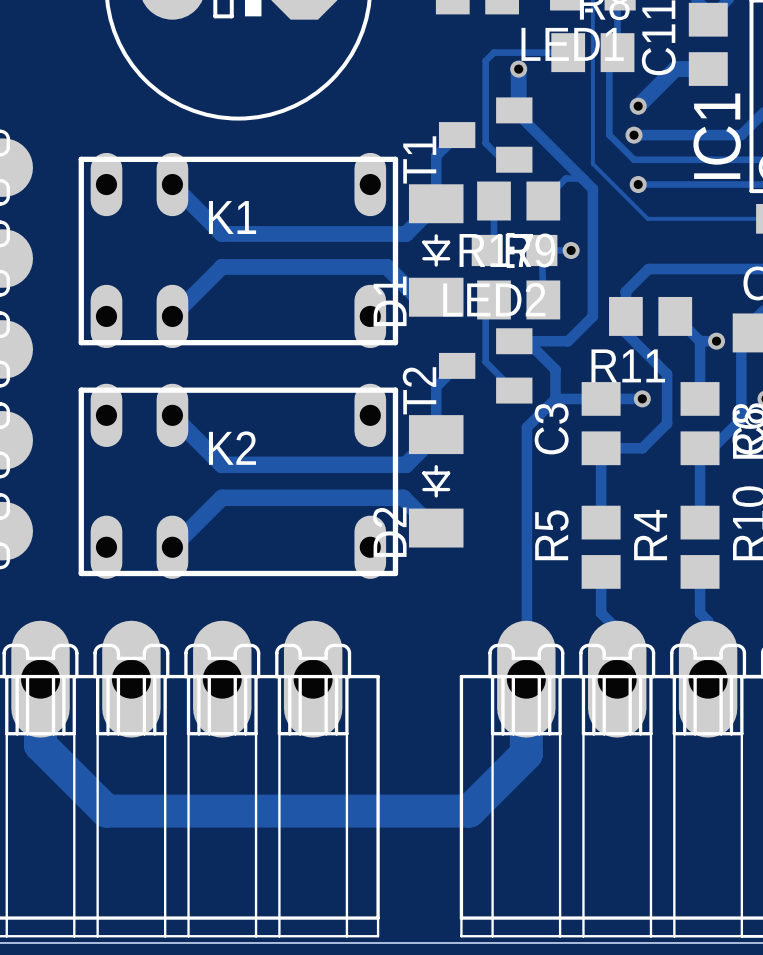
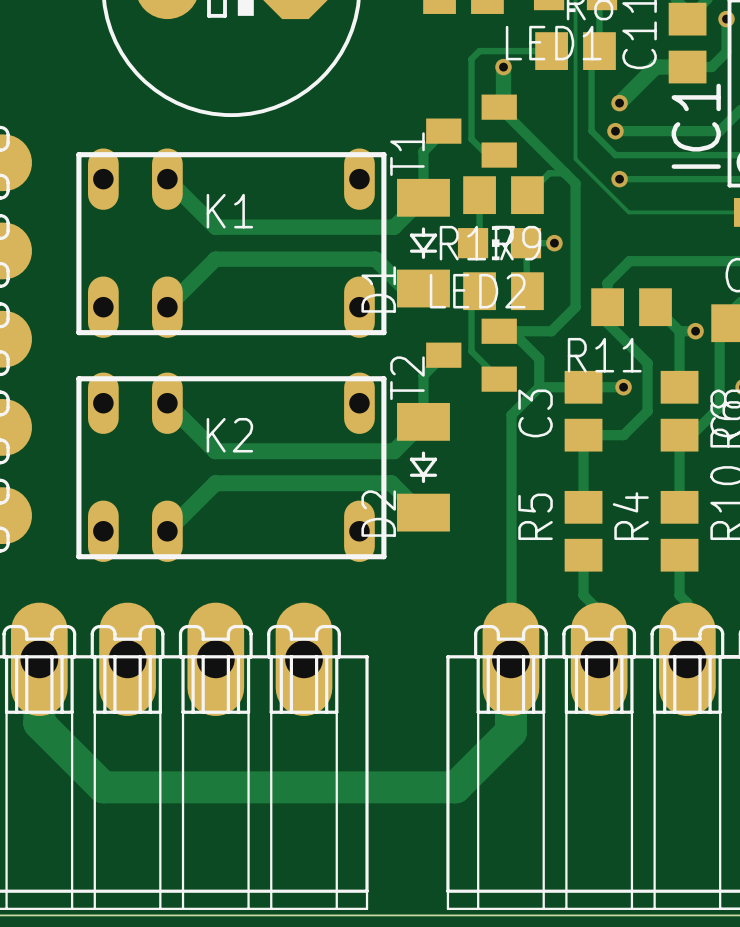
track: none -> (726, 19) (726, 52) (711, 67) (687, 67)
via: none -> (726, 19)

